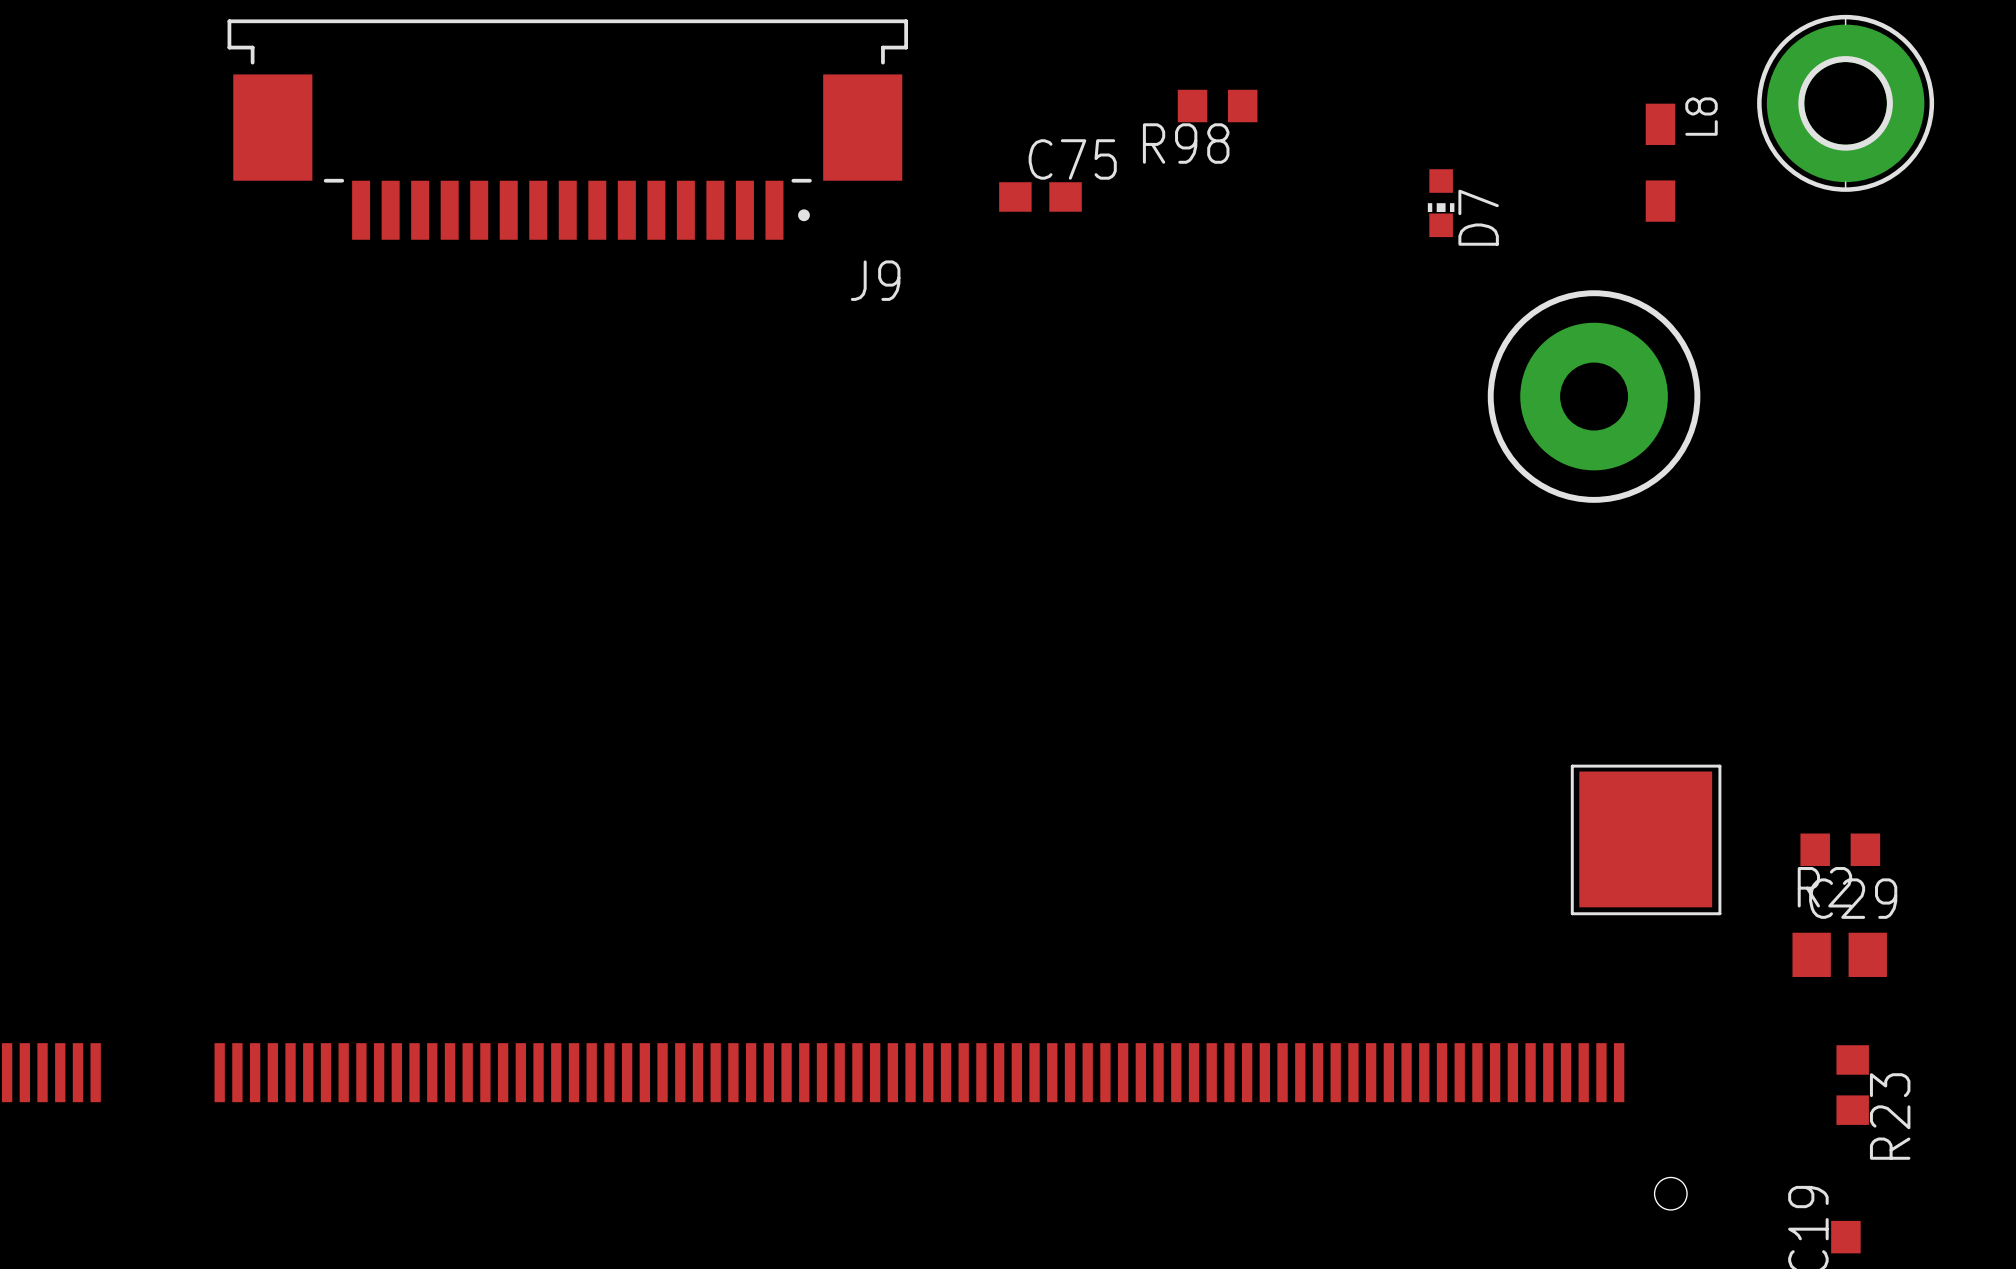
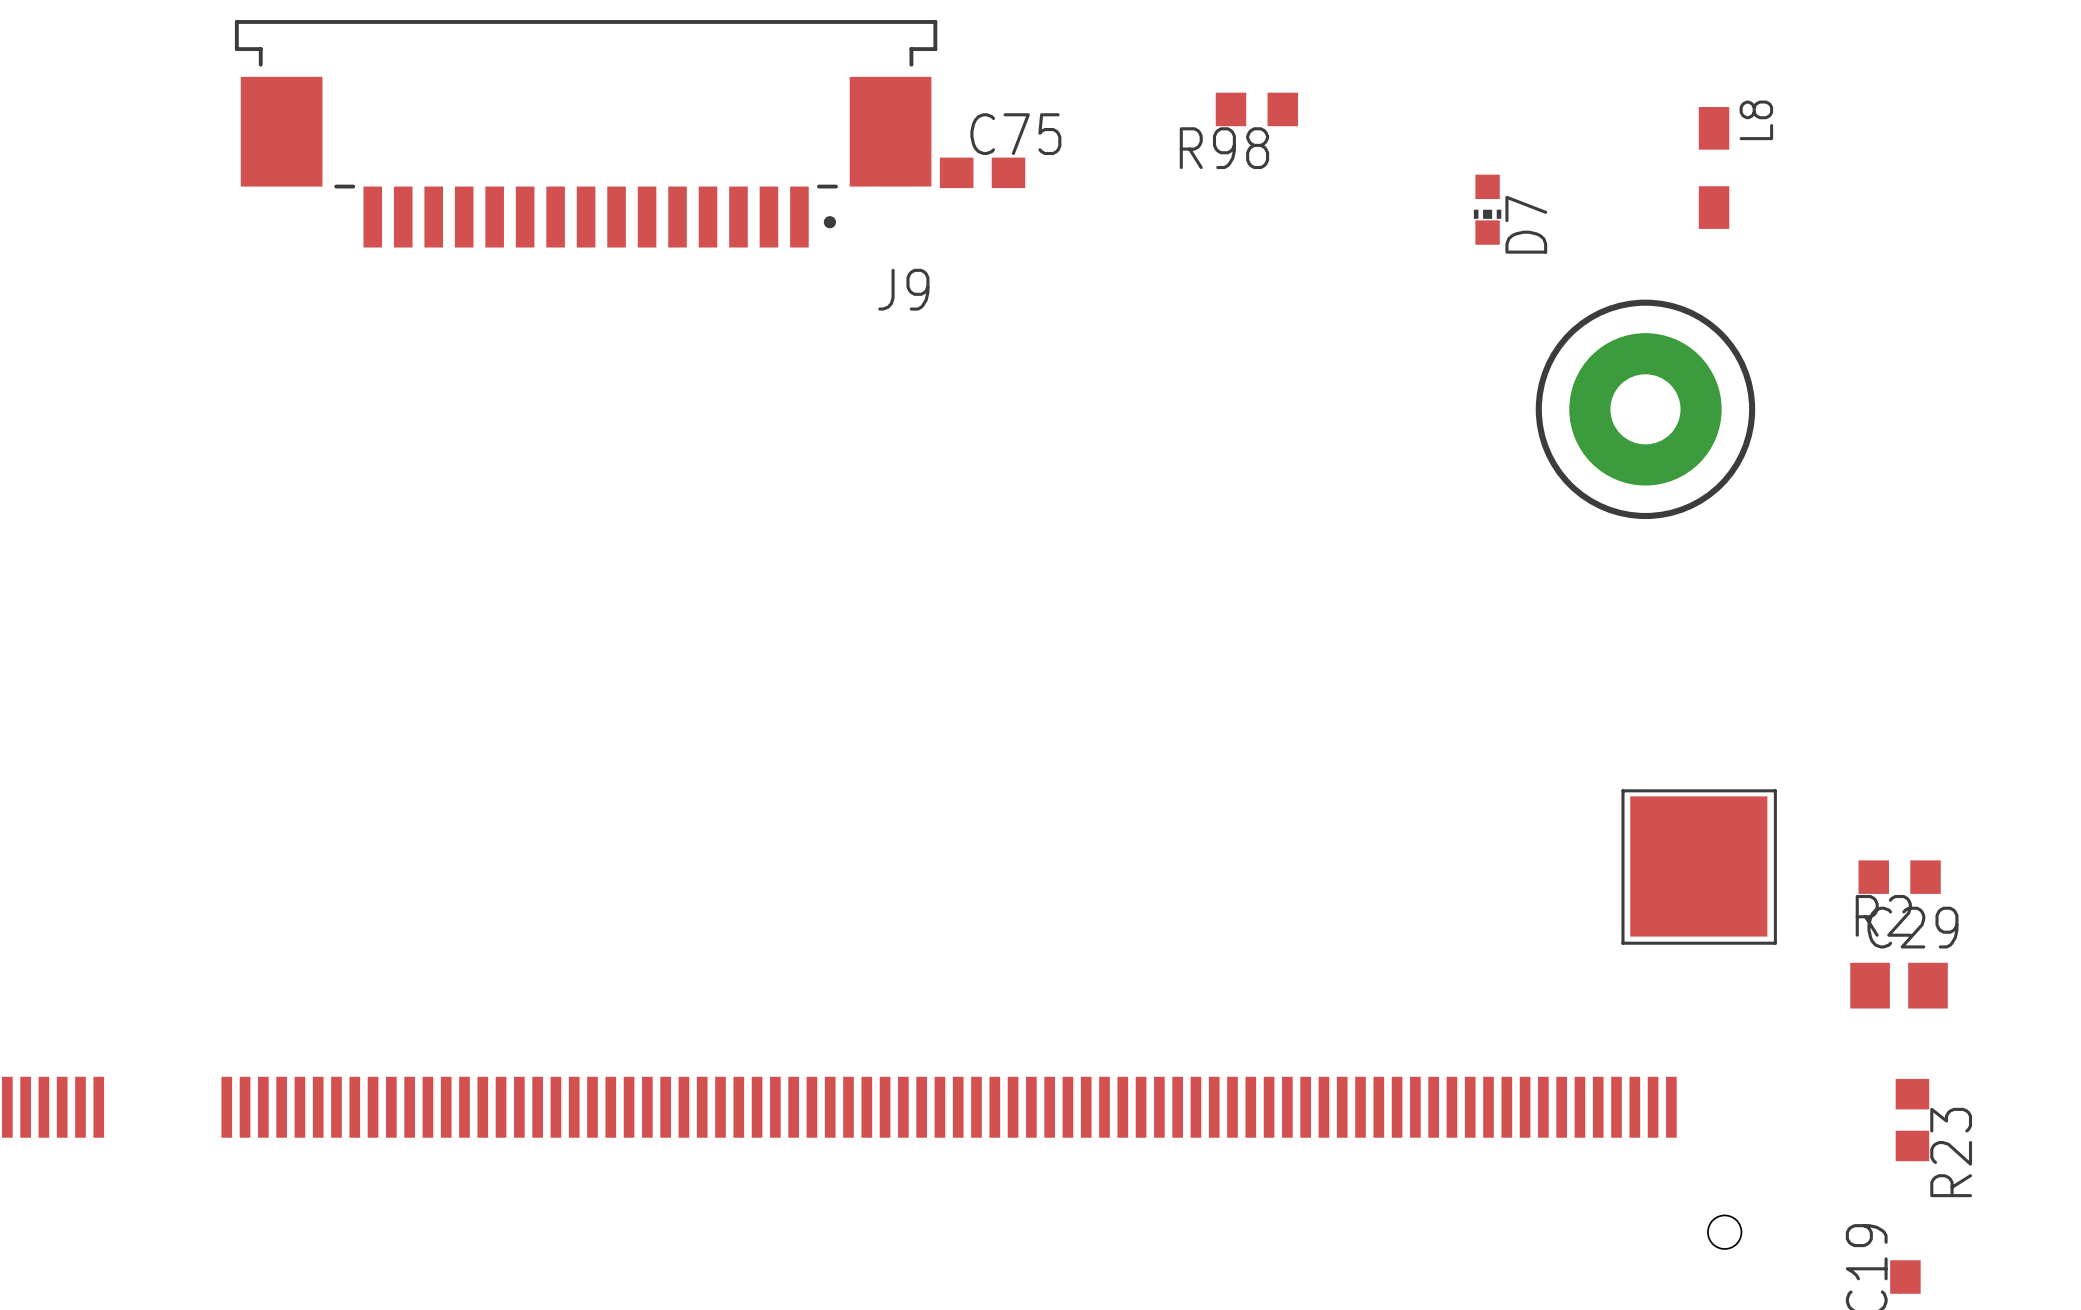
part: (1845, 103) -> none
C75 position: (1040, 196) -> (982, 172)

